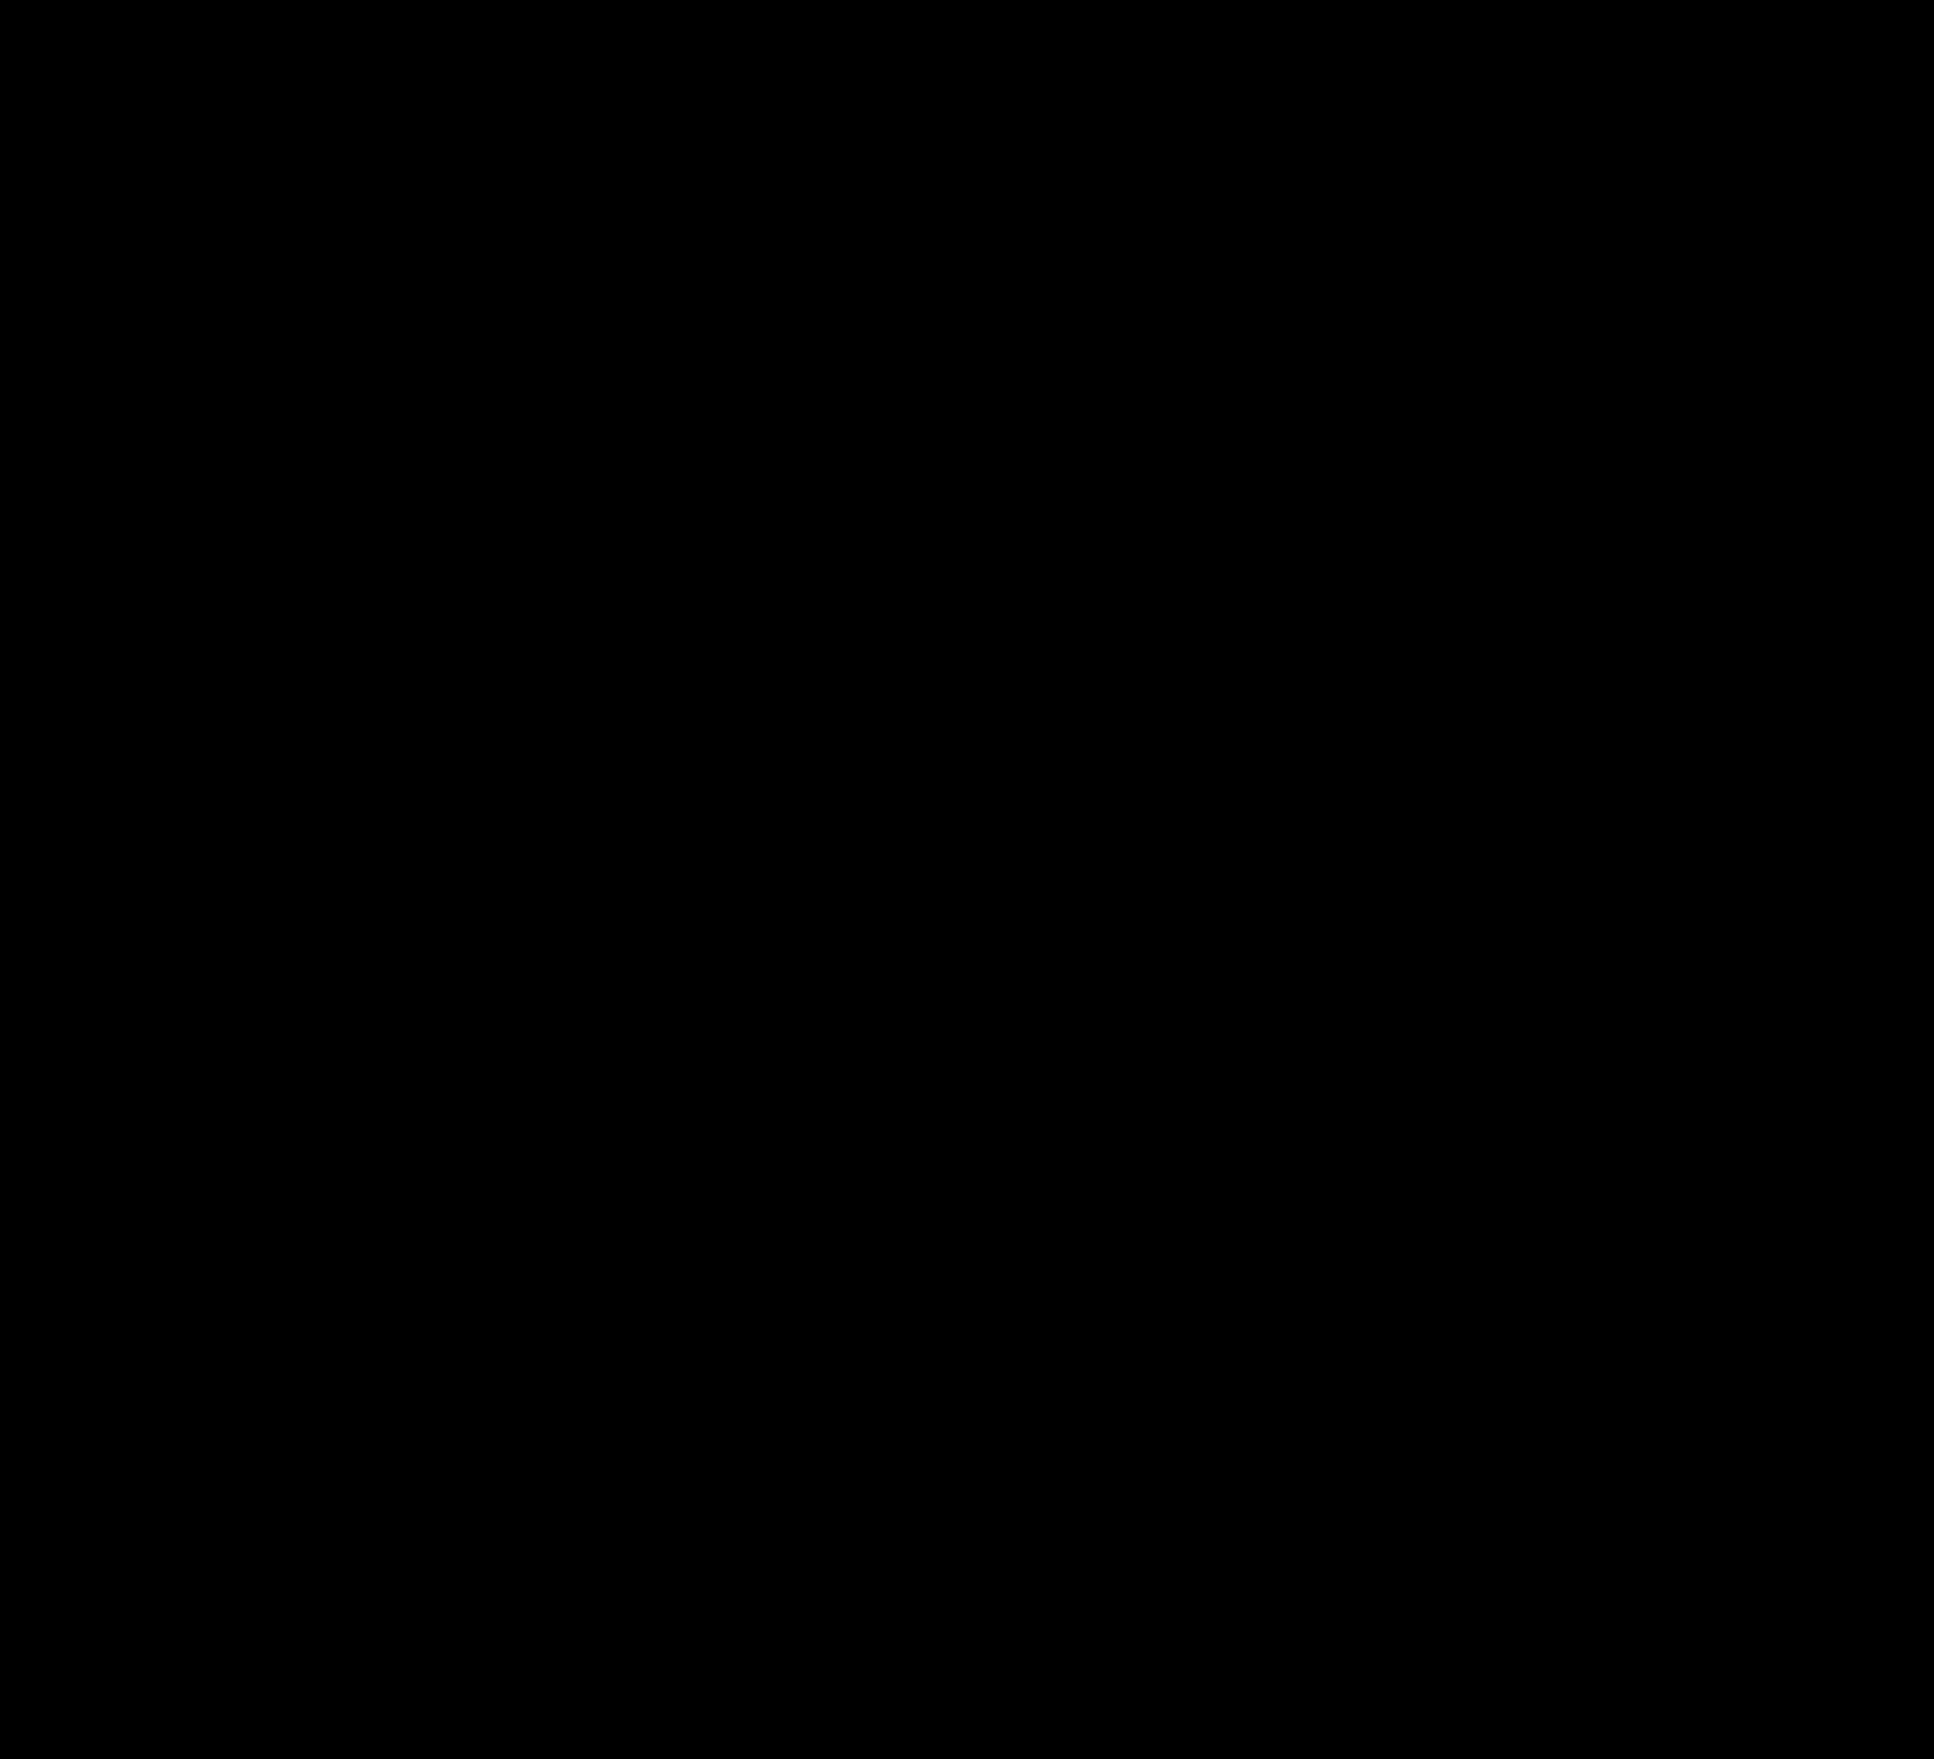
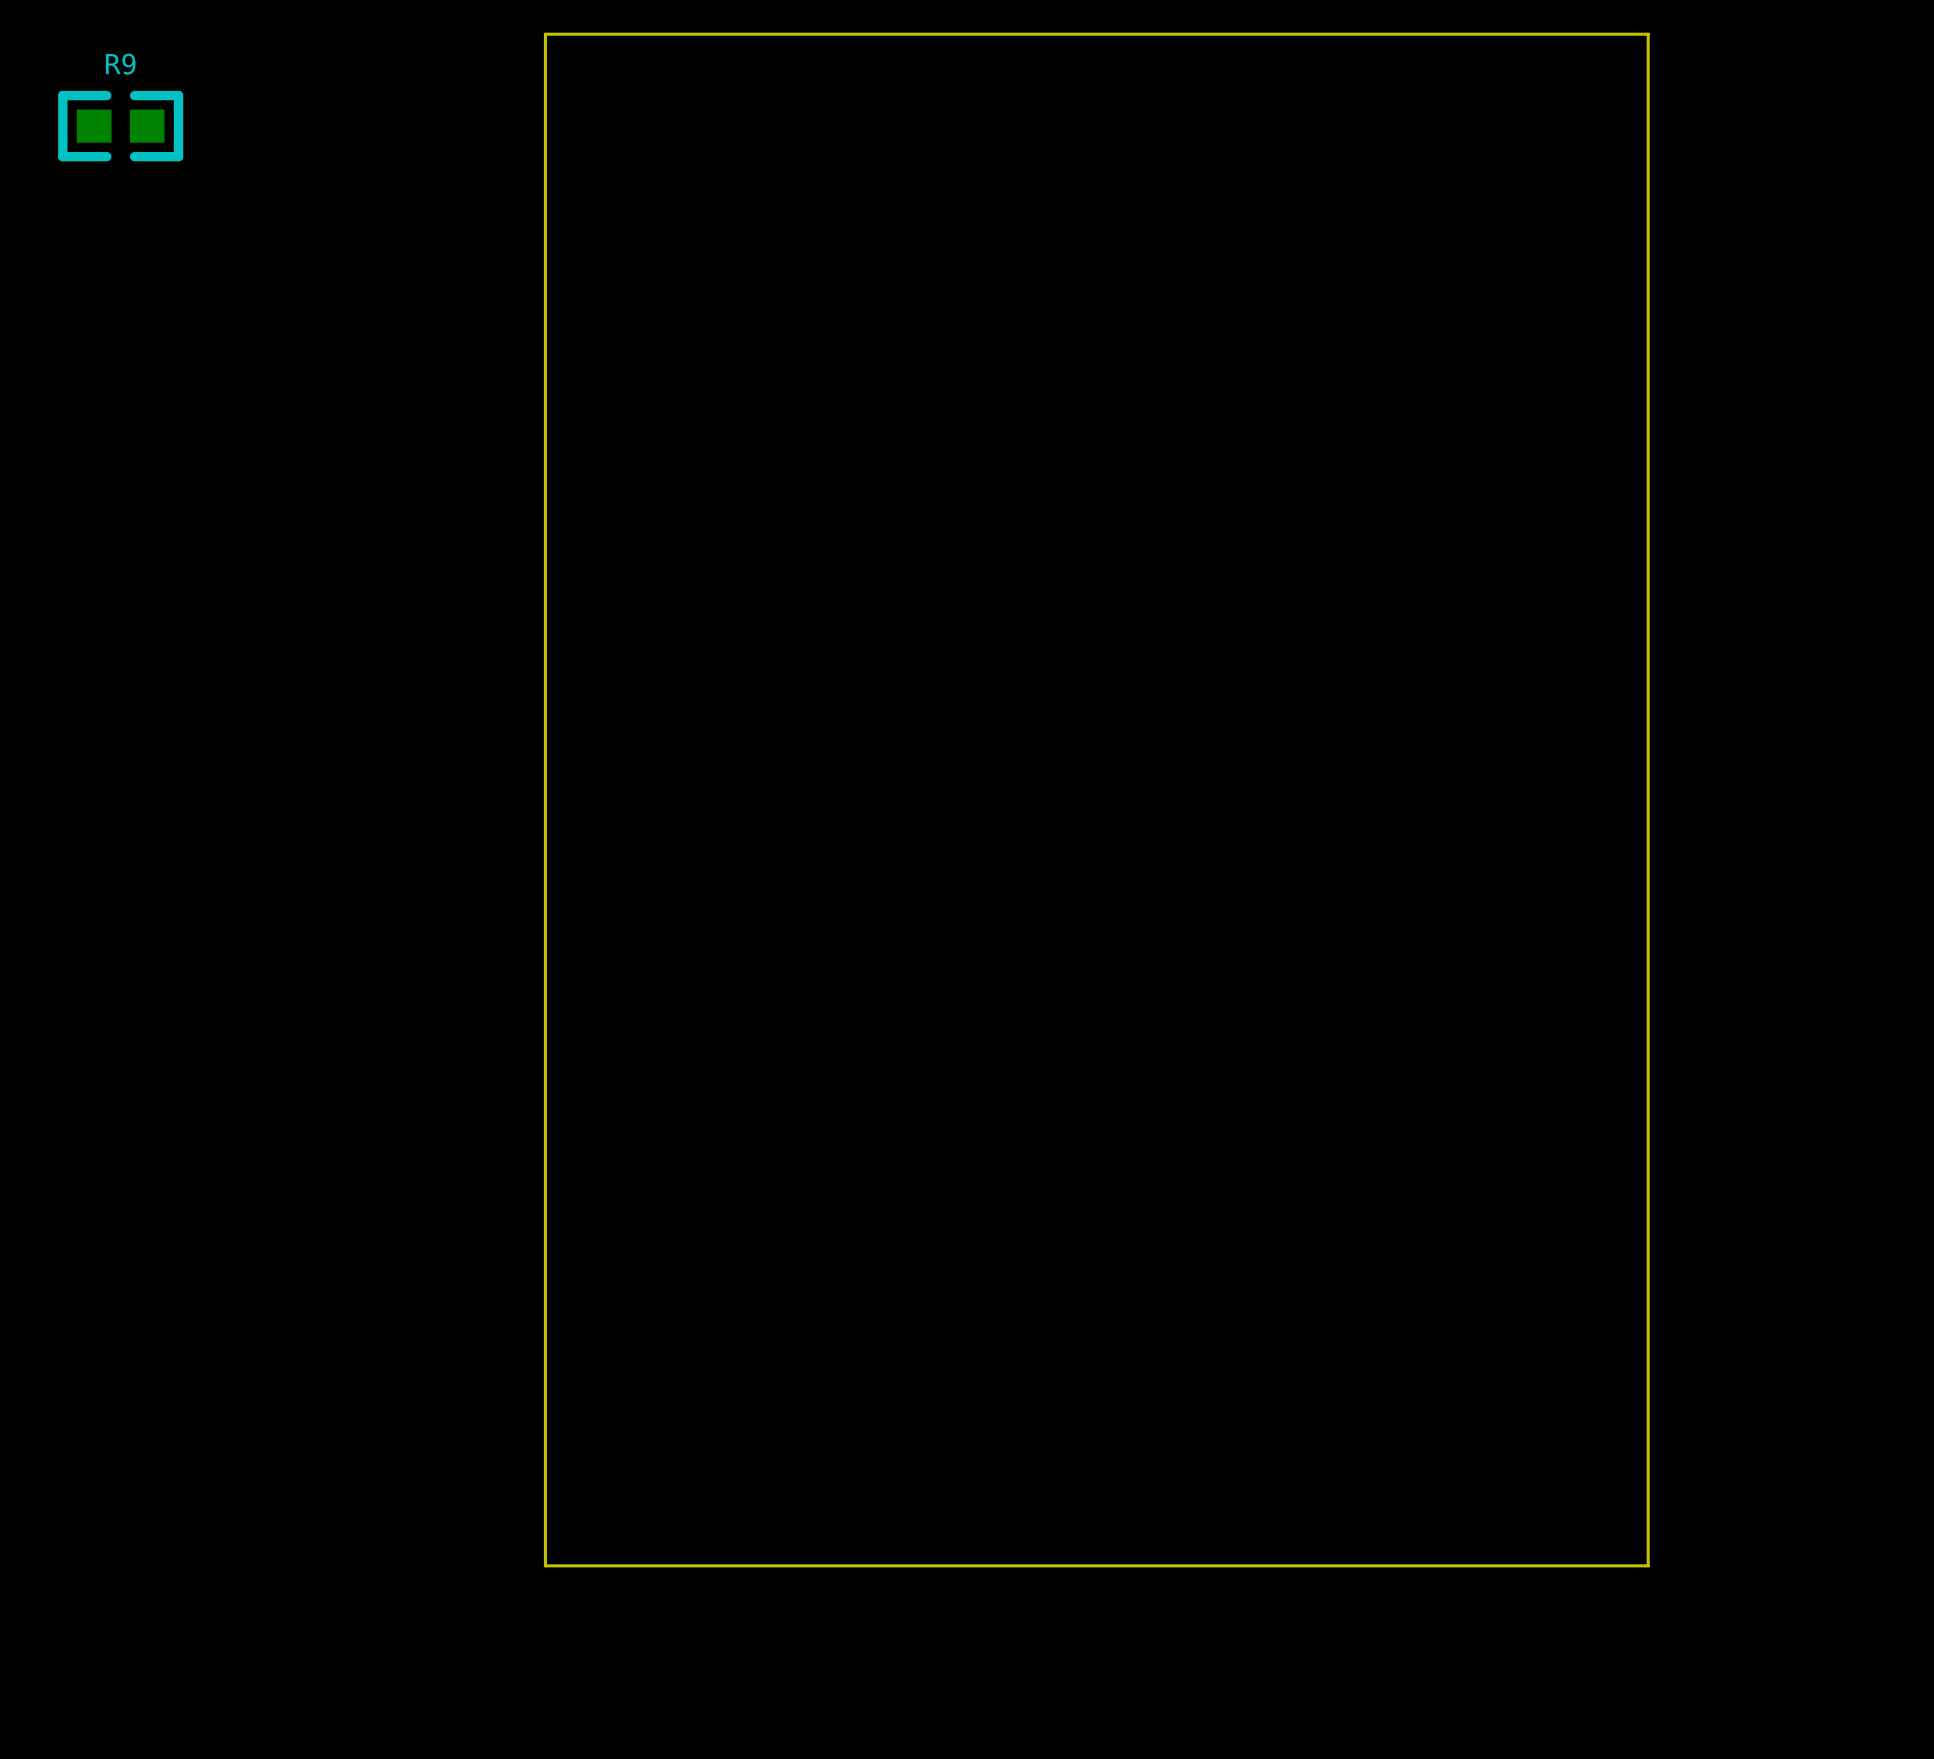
board edge: none -> (1648, 34) (545, 34) (545, 1565) (1648, 1565) (1648, 34)
R9: none -> (120, 126)

